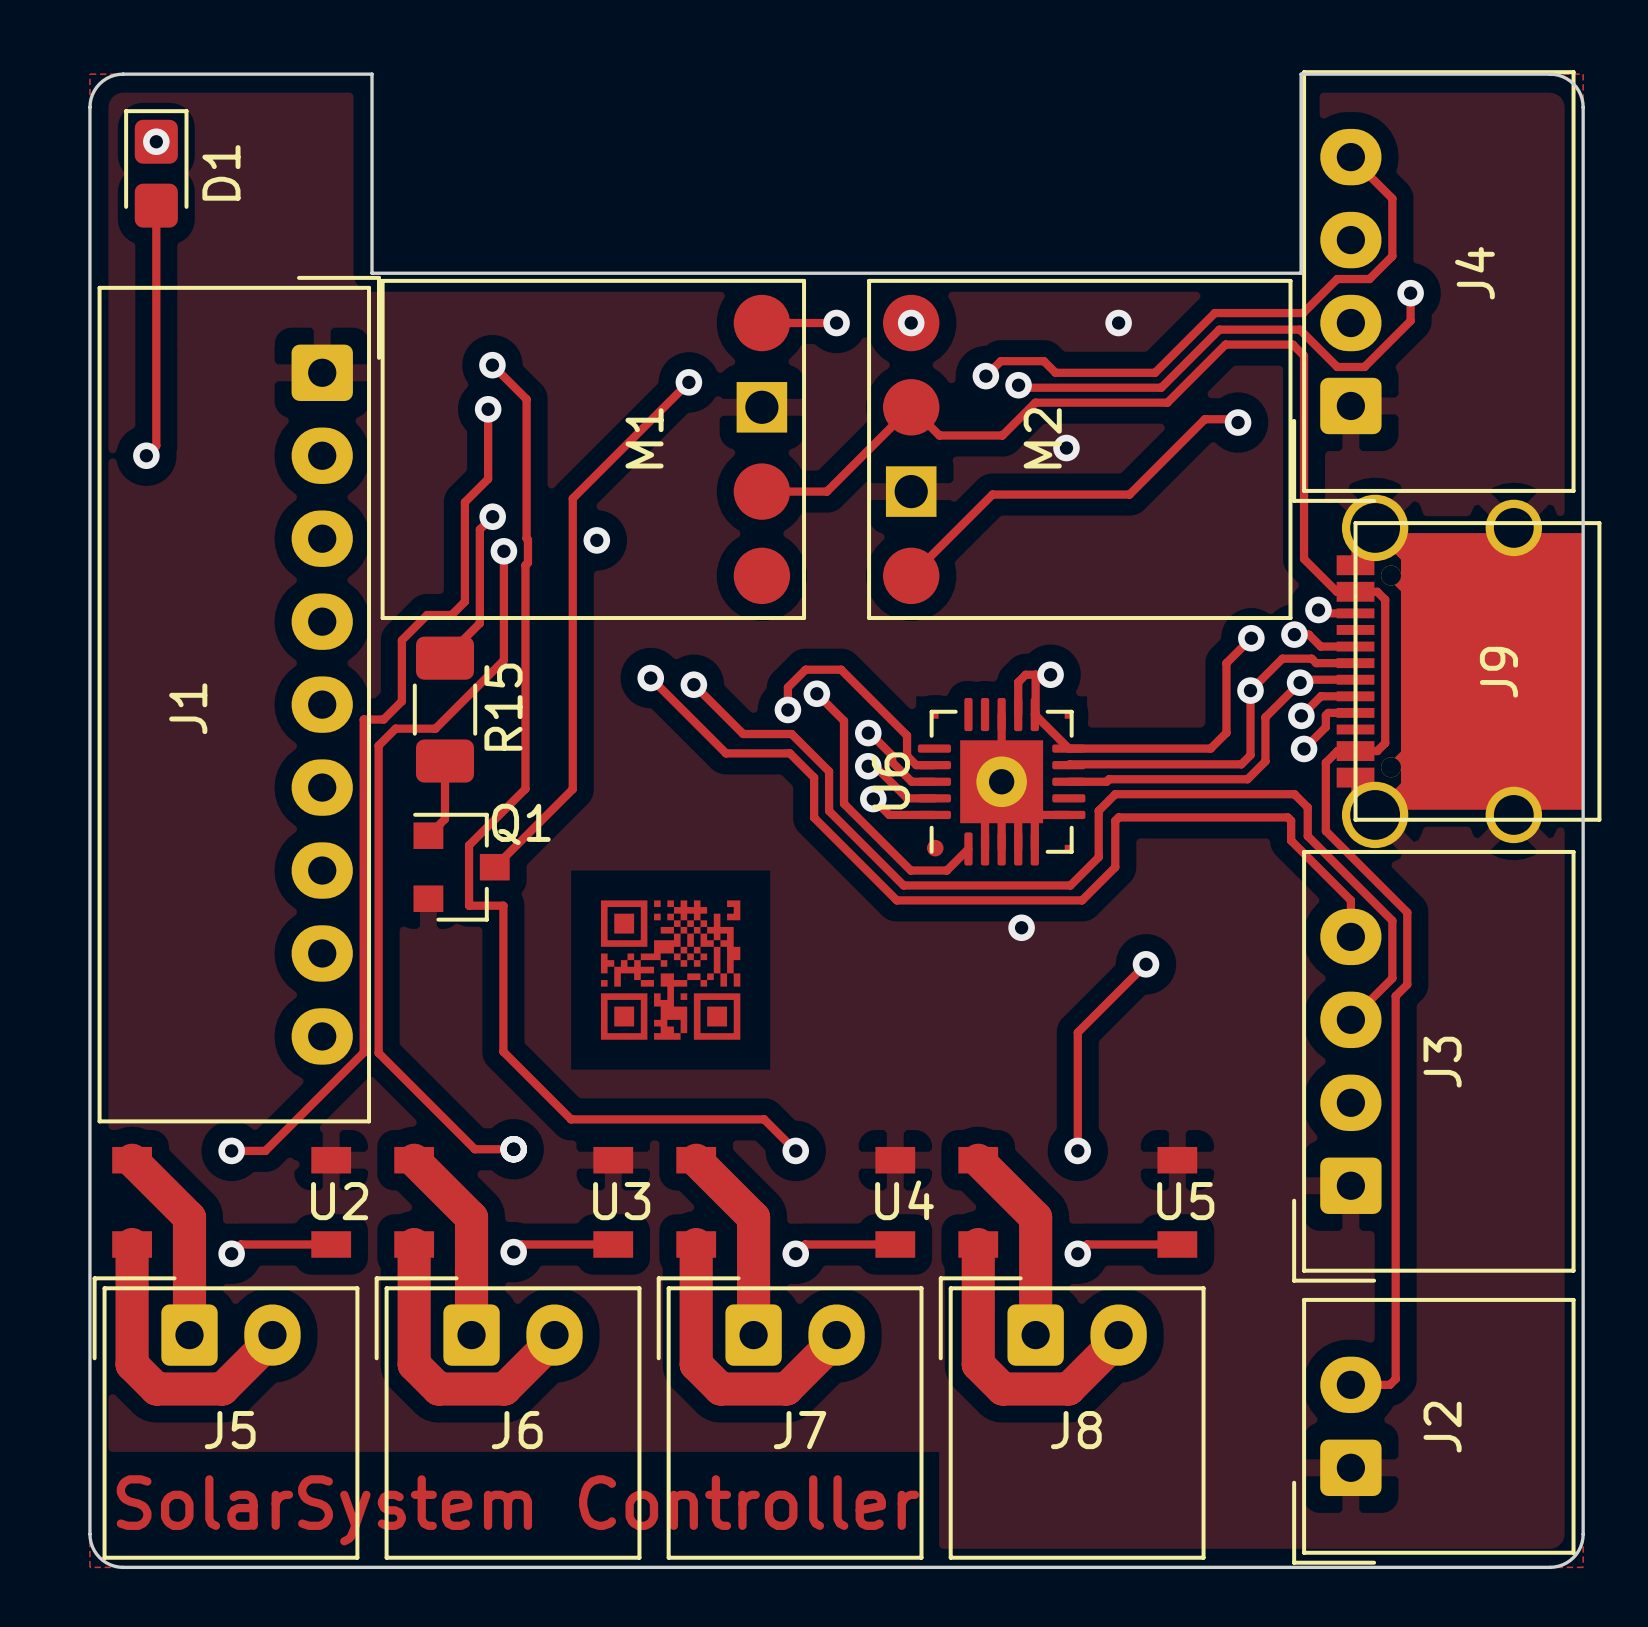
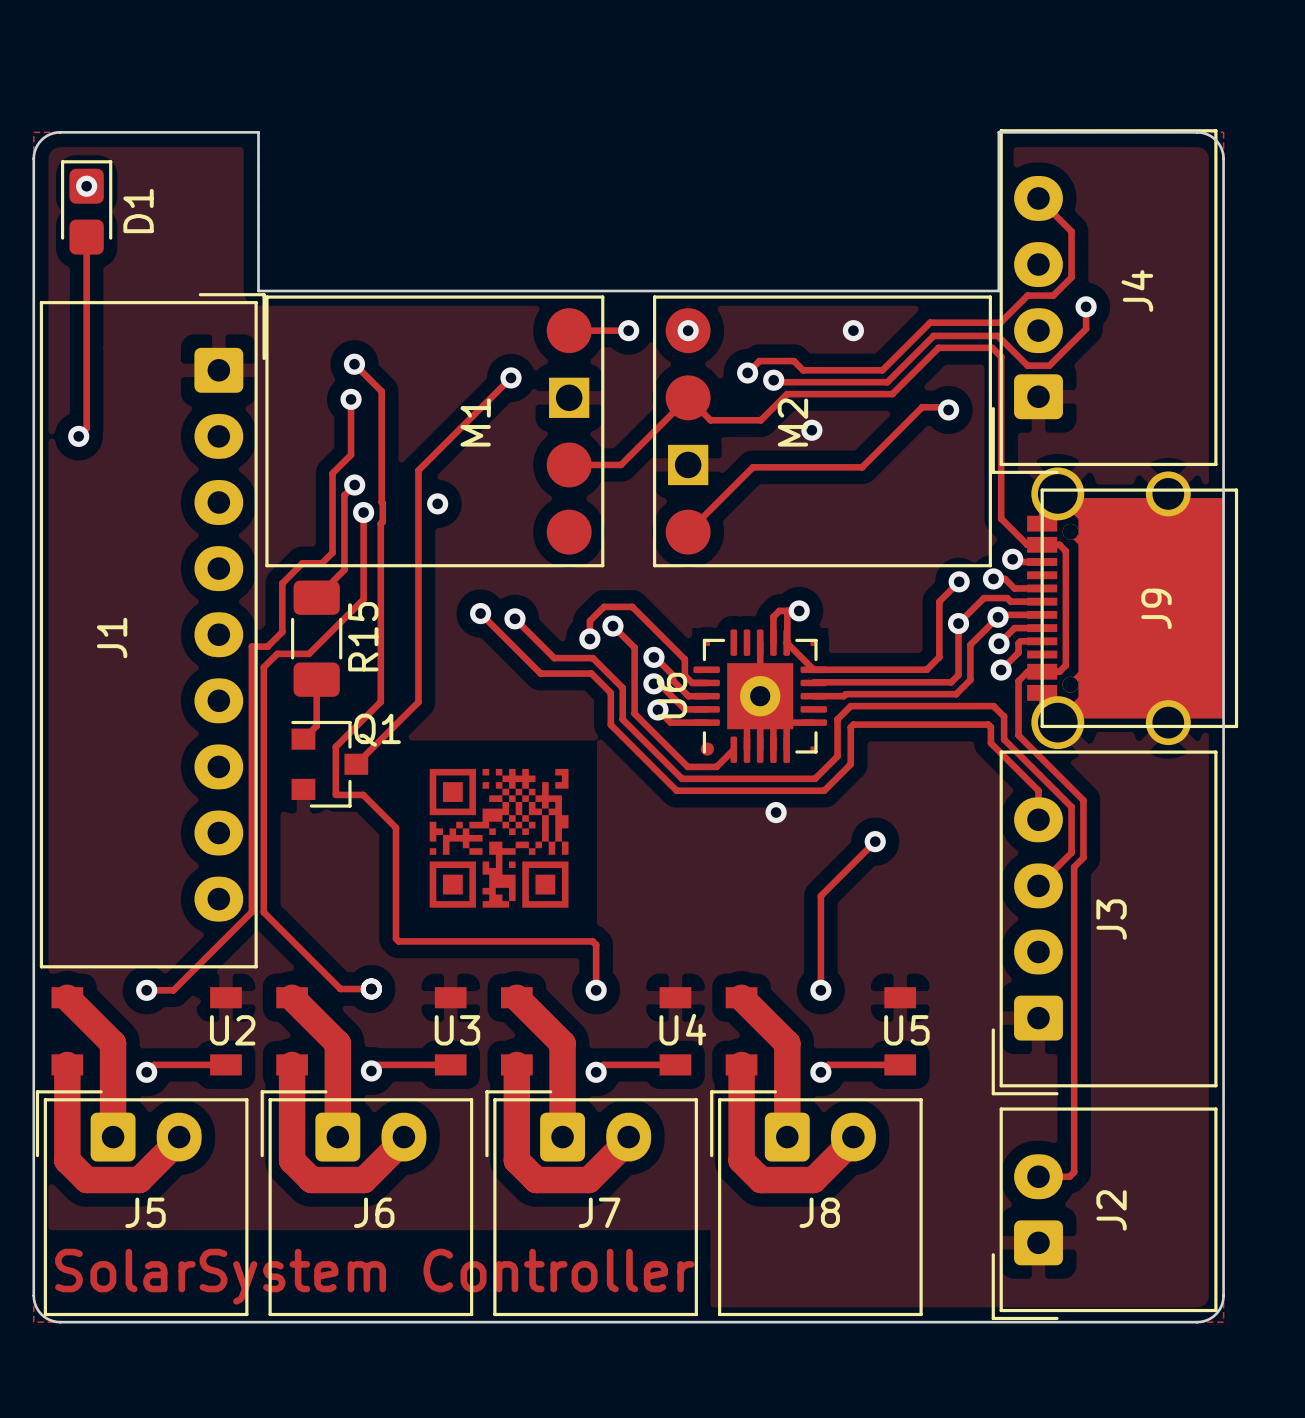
part footprint: [600, 900, 741, 1040] -> [429, 768, 569, 908]
track: (503, 905) (503, 1051) (571, 1119) (764, 1119) (795, 1150) -> (363, 794) (395, 827) (395, 938) (398, 941) (592, 941) (596, 944) (596, 990)

